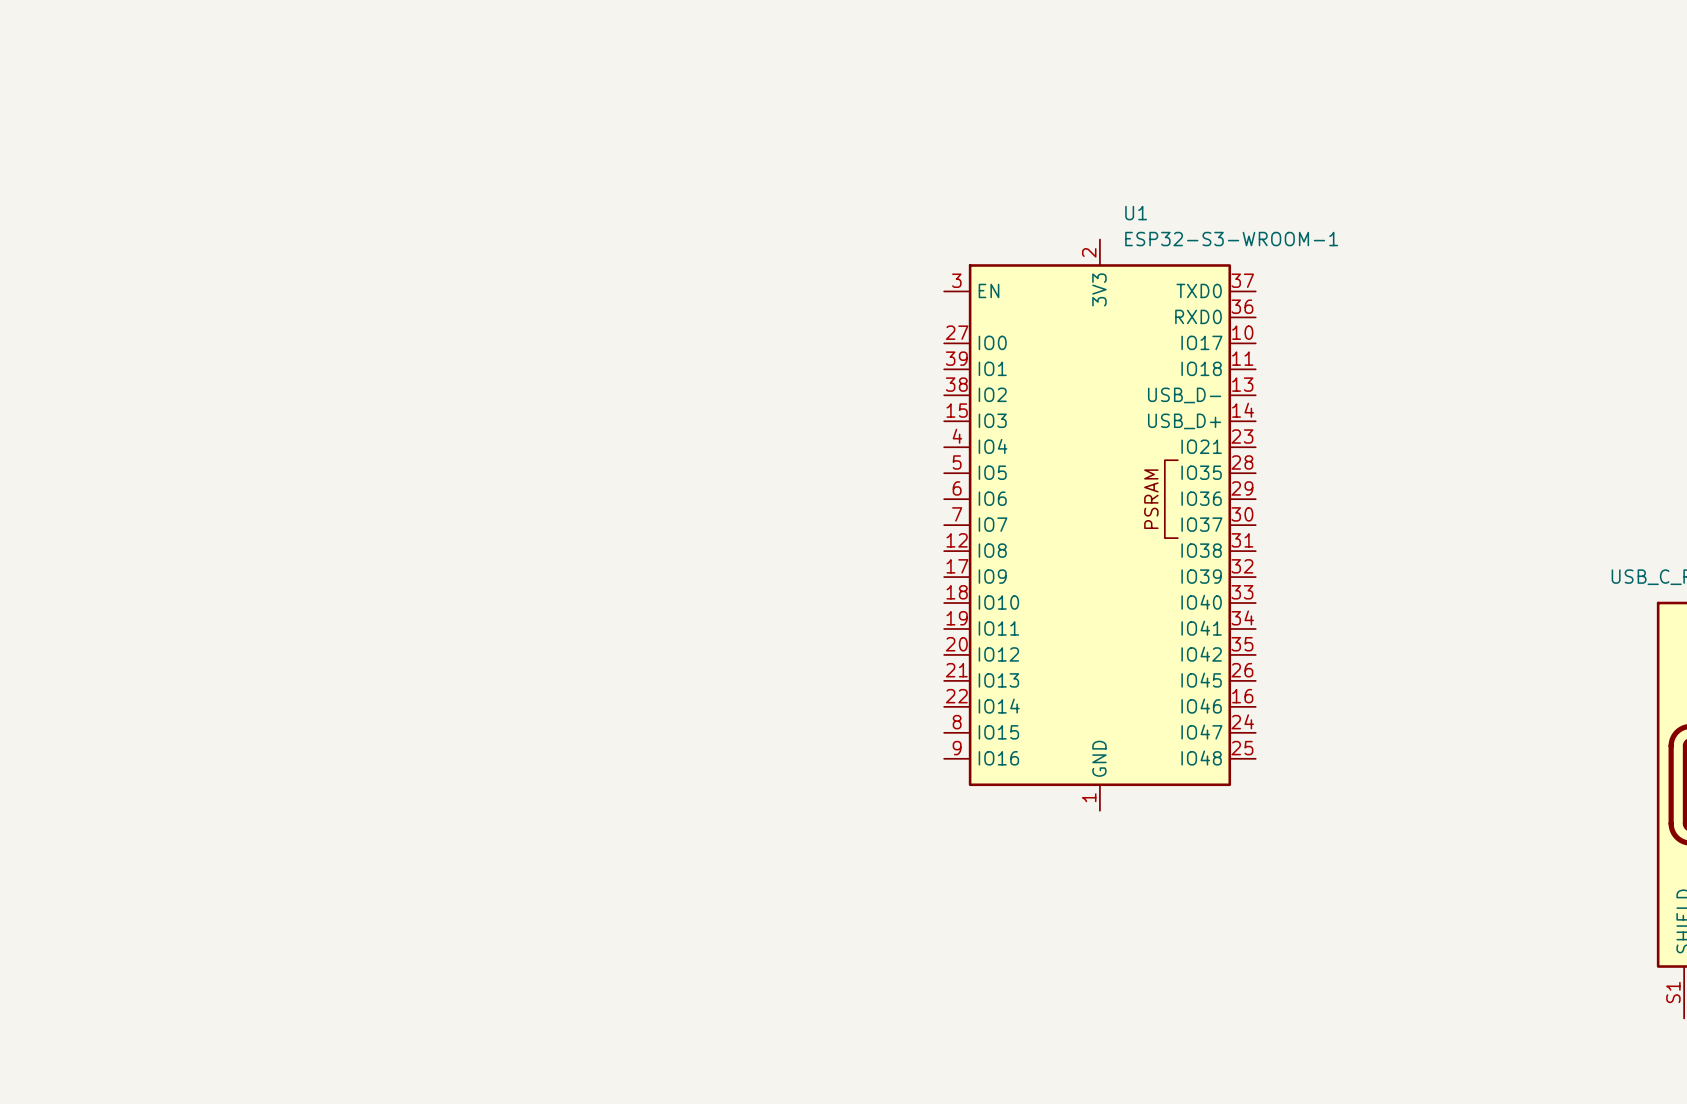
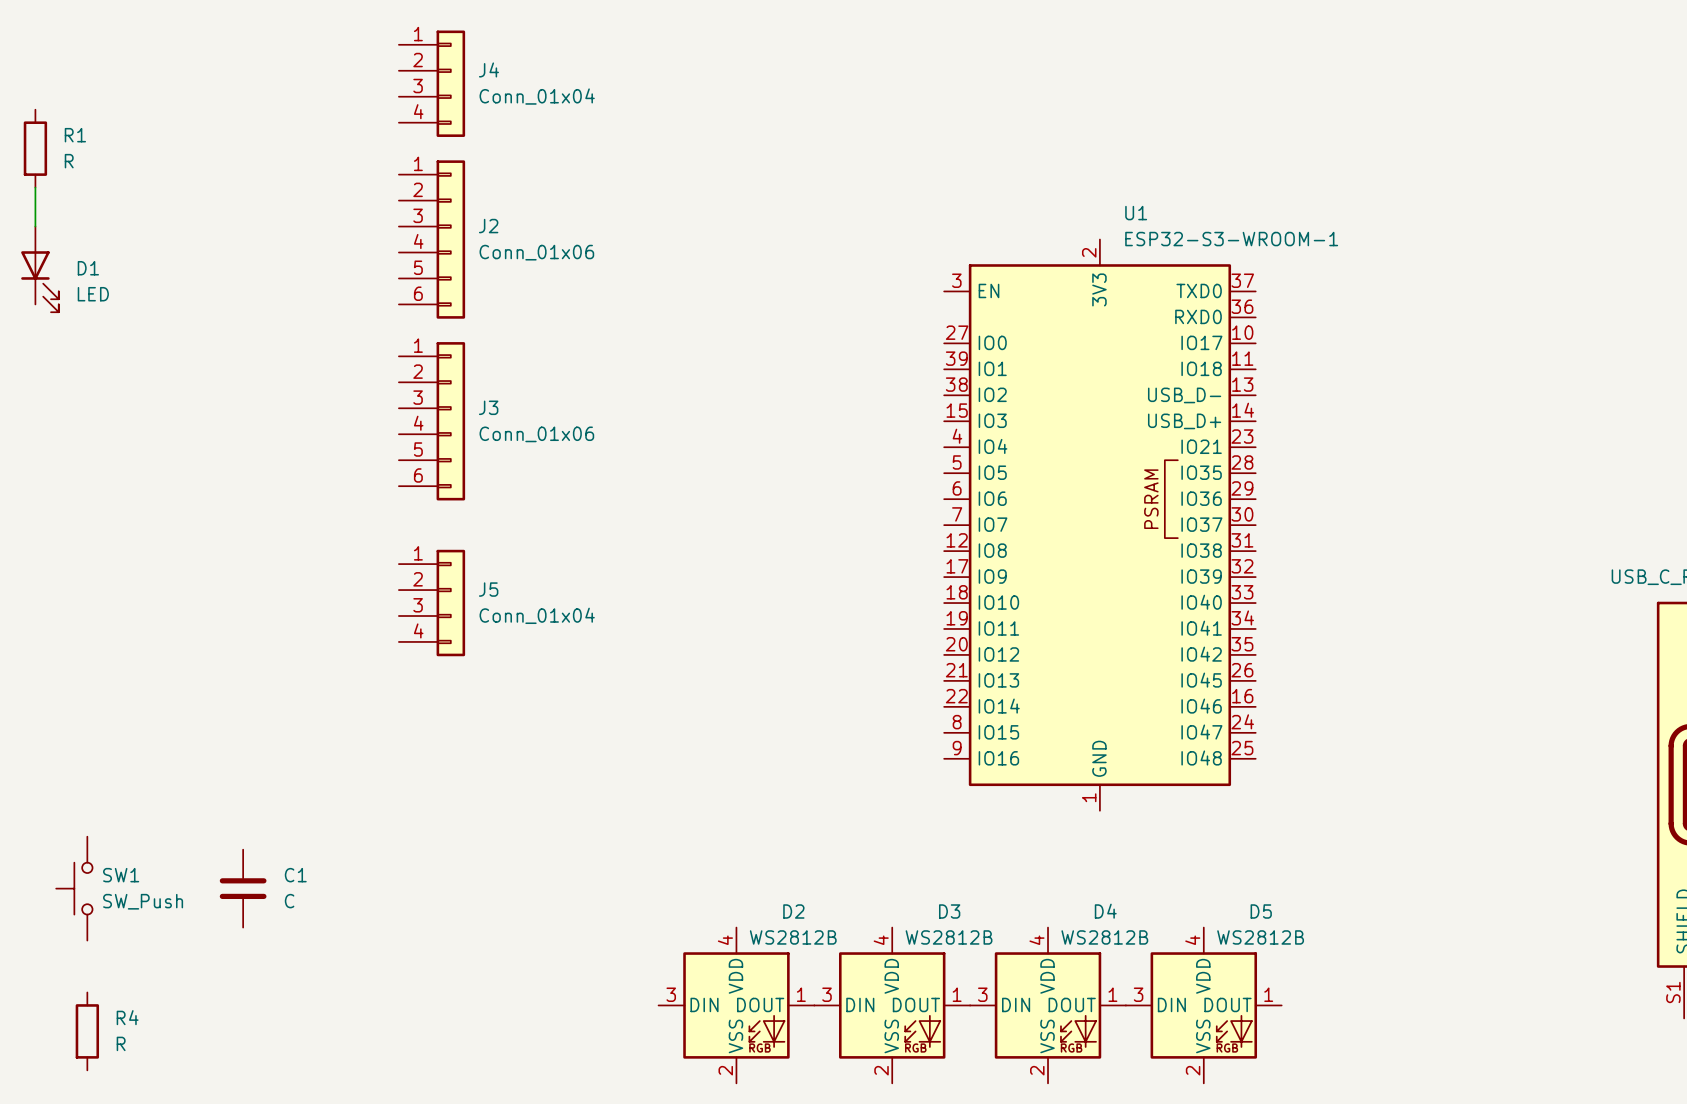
J4: none -> Conn_01x04 (432, 83)
R1: none -> R (35, 148)
wire: none -> (35, 187) (35, 226)
J2: none -> Conn_01x06 (432, 239)
D1: none -> LED (39, 269)
J3: none -> Conn_01x06 (432, 421)
J5: none -> Conn_01x04 (432, 603)
SW1: none -> SW_Push (74, 888)
C1: none -> C (243, 888)
D2: none -> WS2812B (736, 1005)
D3: none -> WS2812B (892, 1005)
D4: none -> WS2812B (1048, 1005)
D5: none -> WS2812B (1203, 1005)
R4: none -> R (87, 1031)

